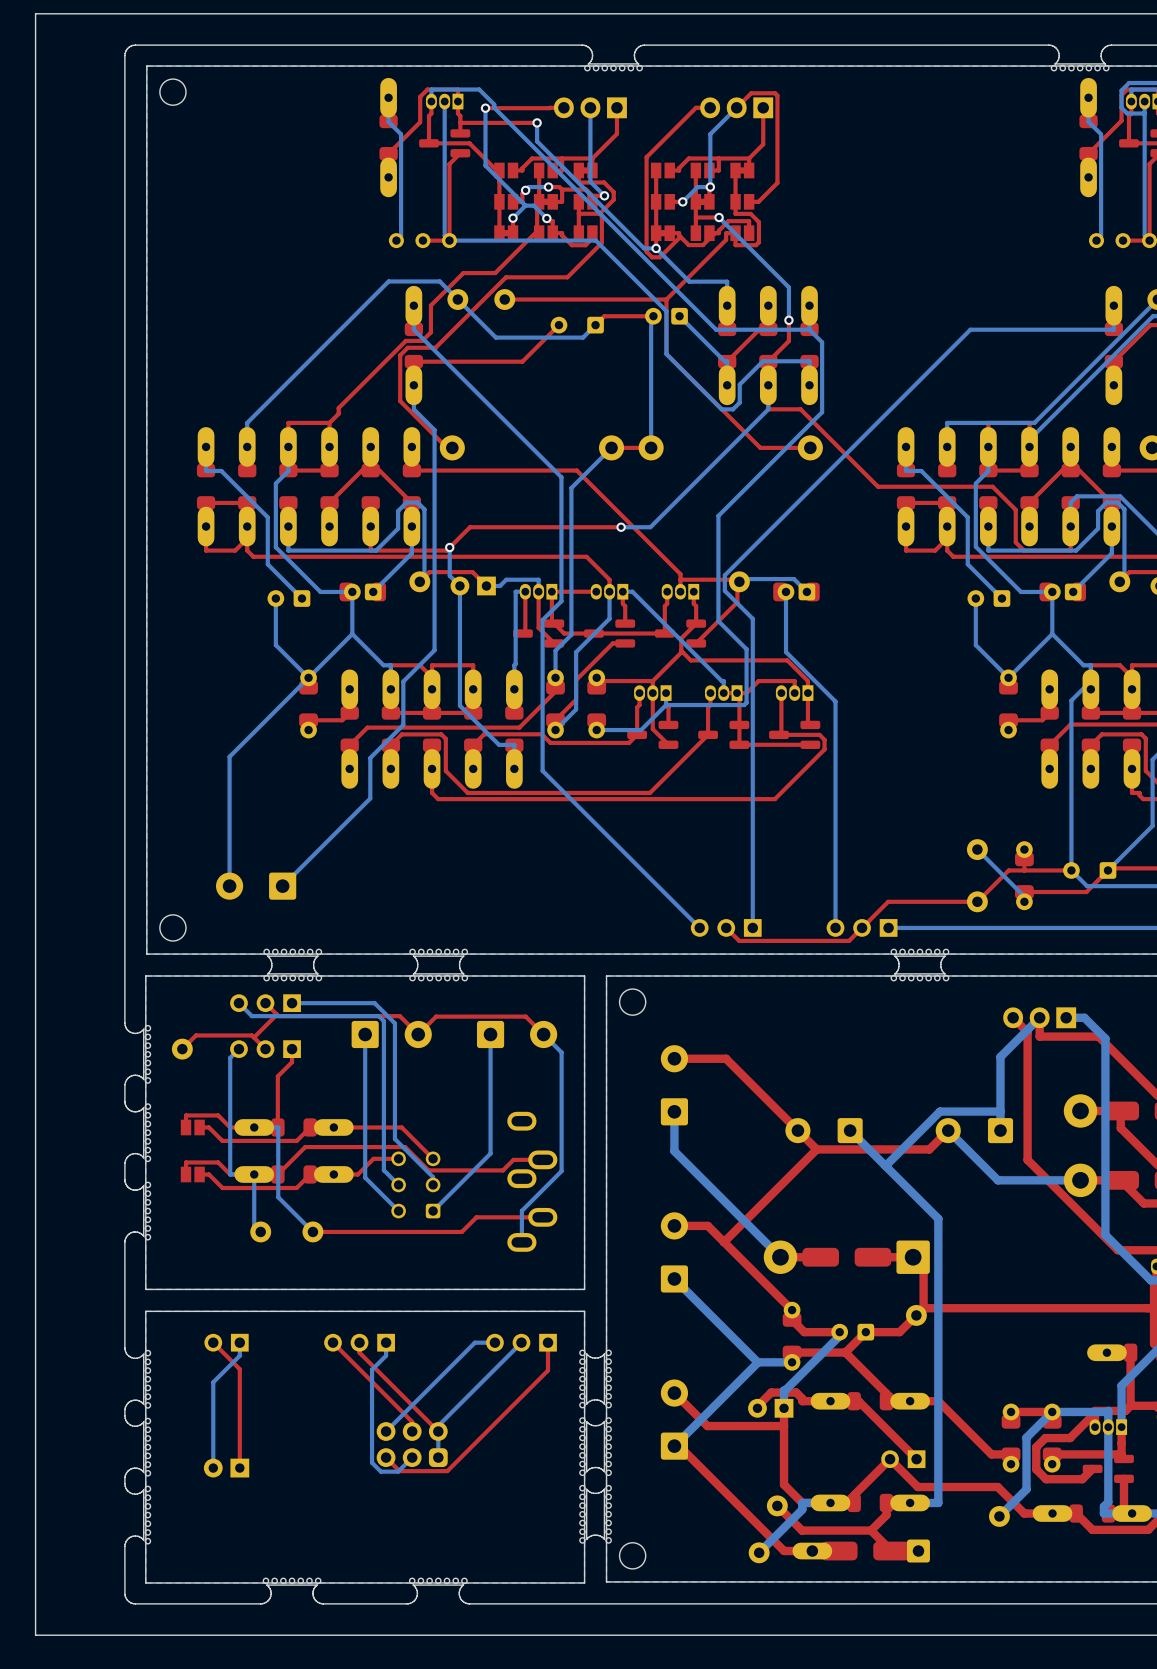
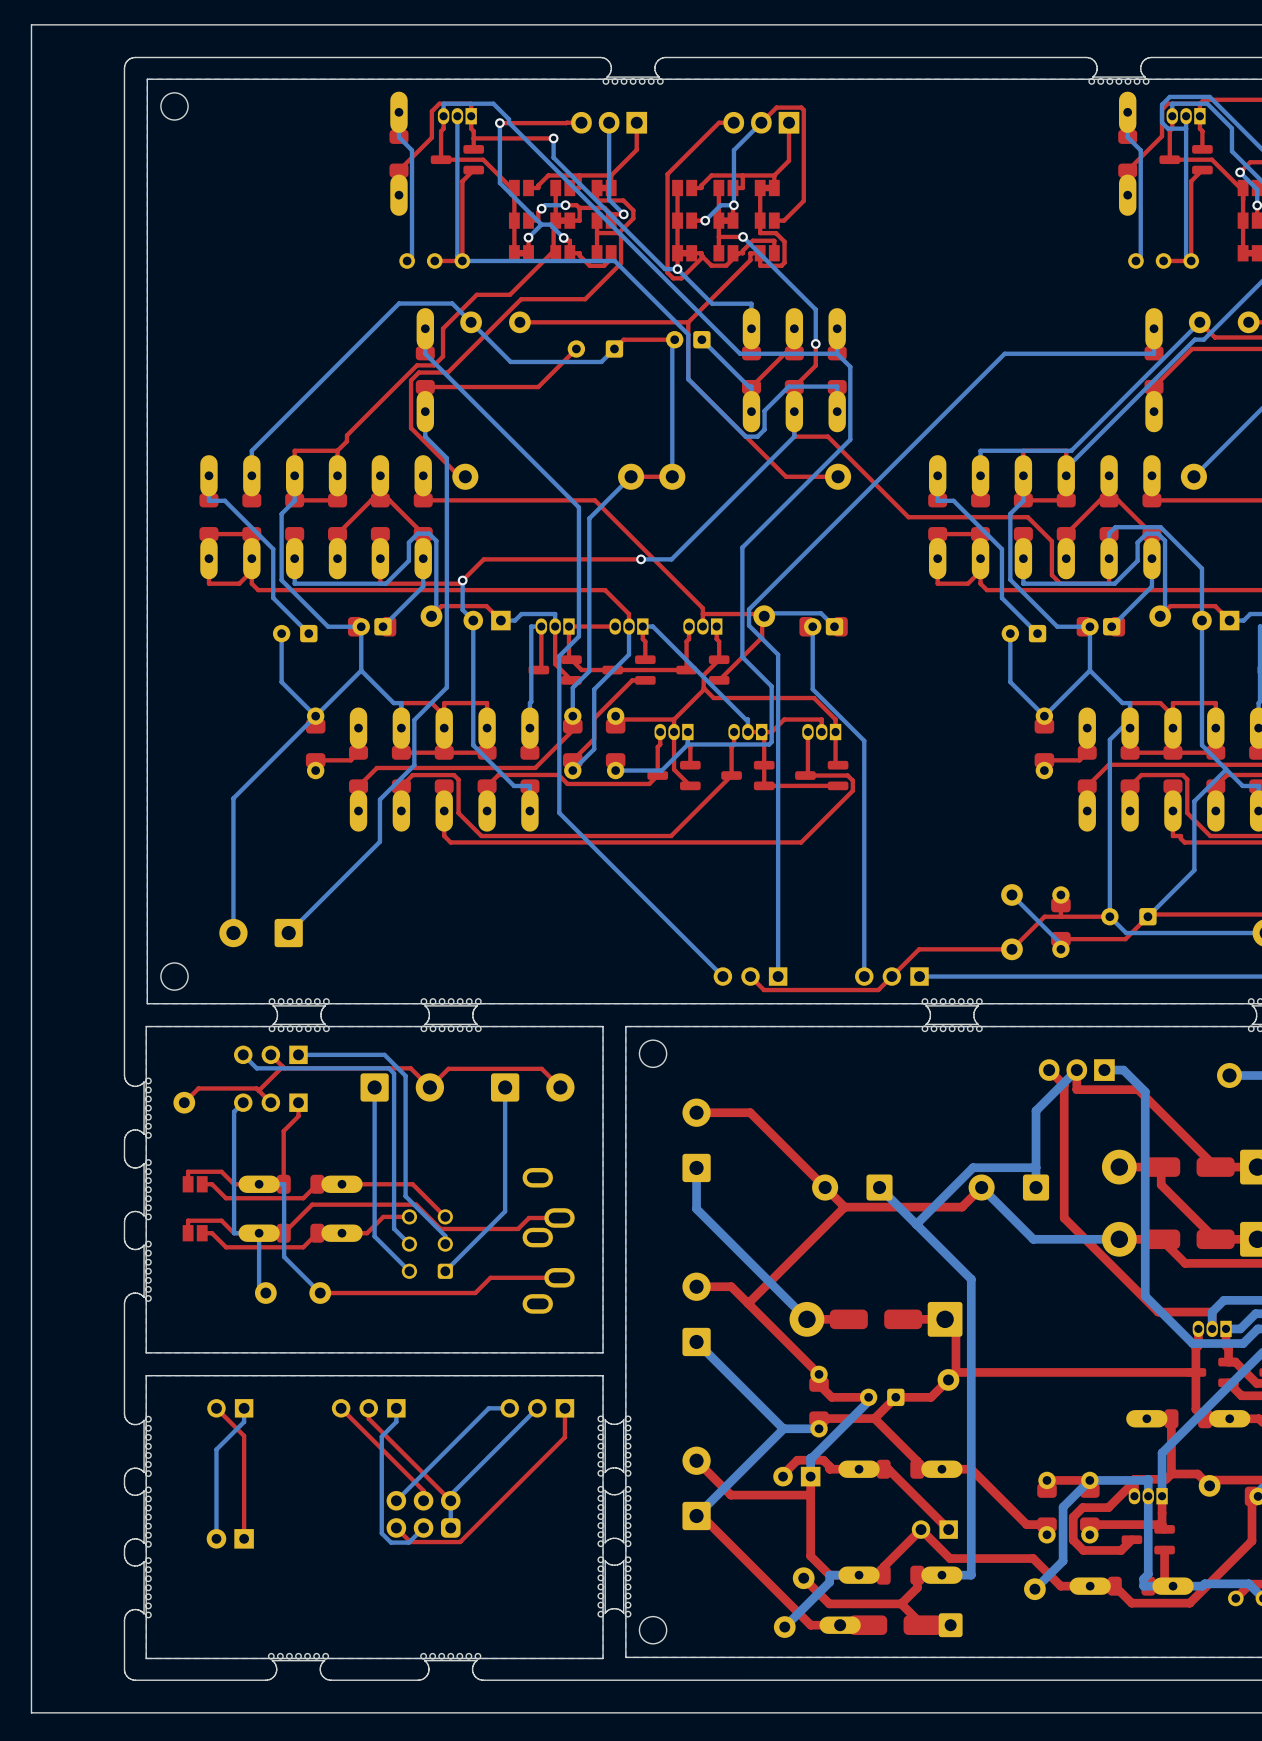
bottom track: (543, 1034) (561, 1052) (561, 1171) (521, 1210) (521, 1242) -> none

